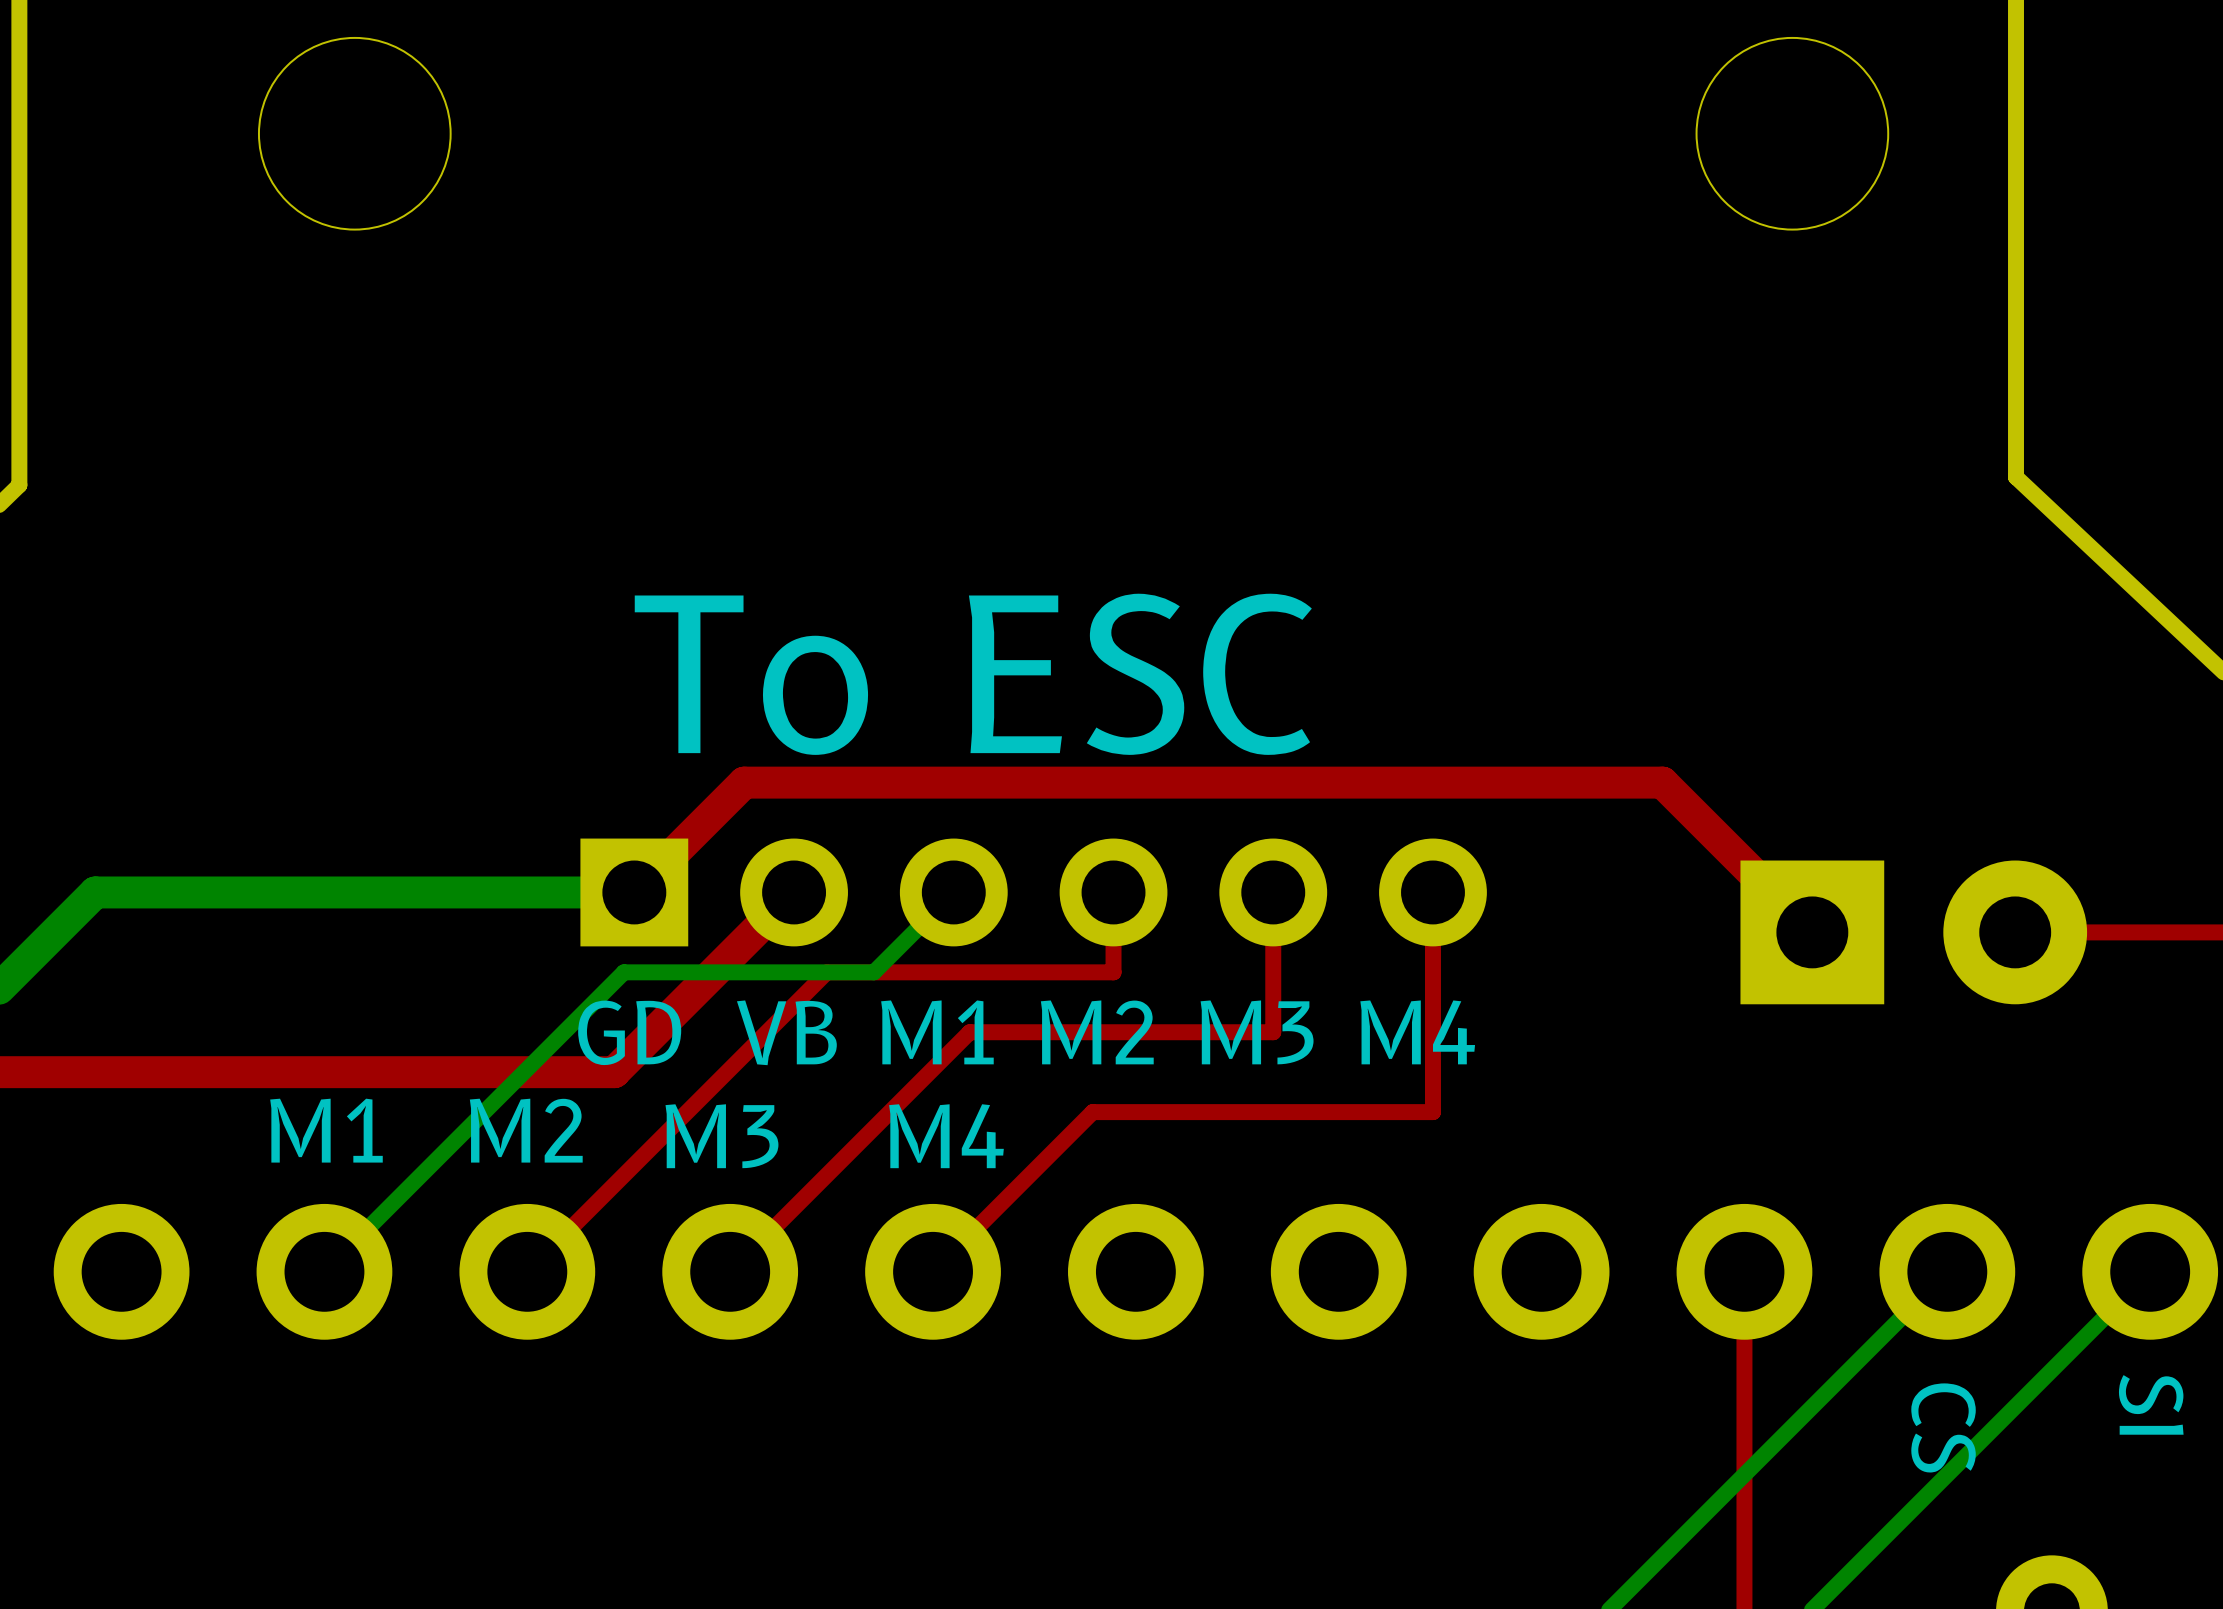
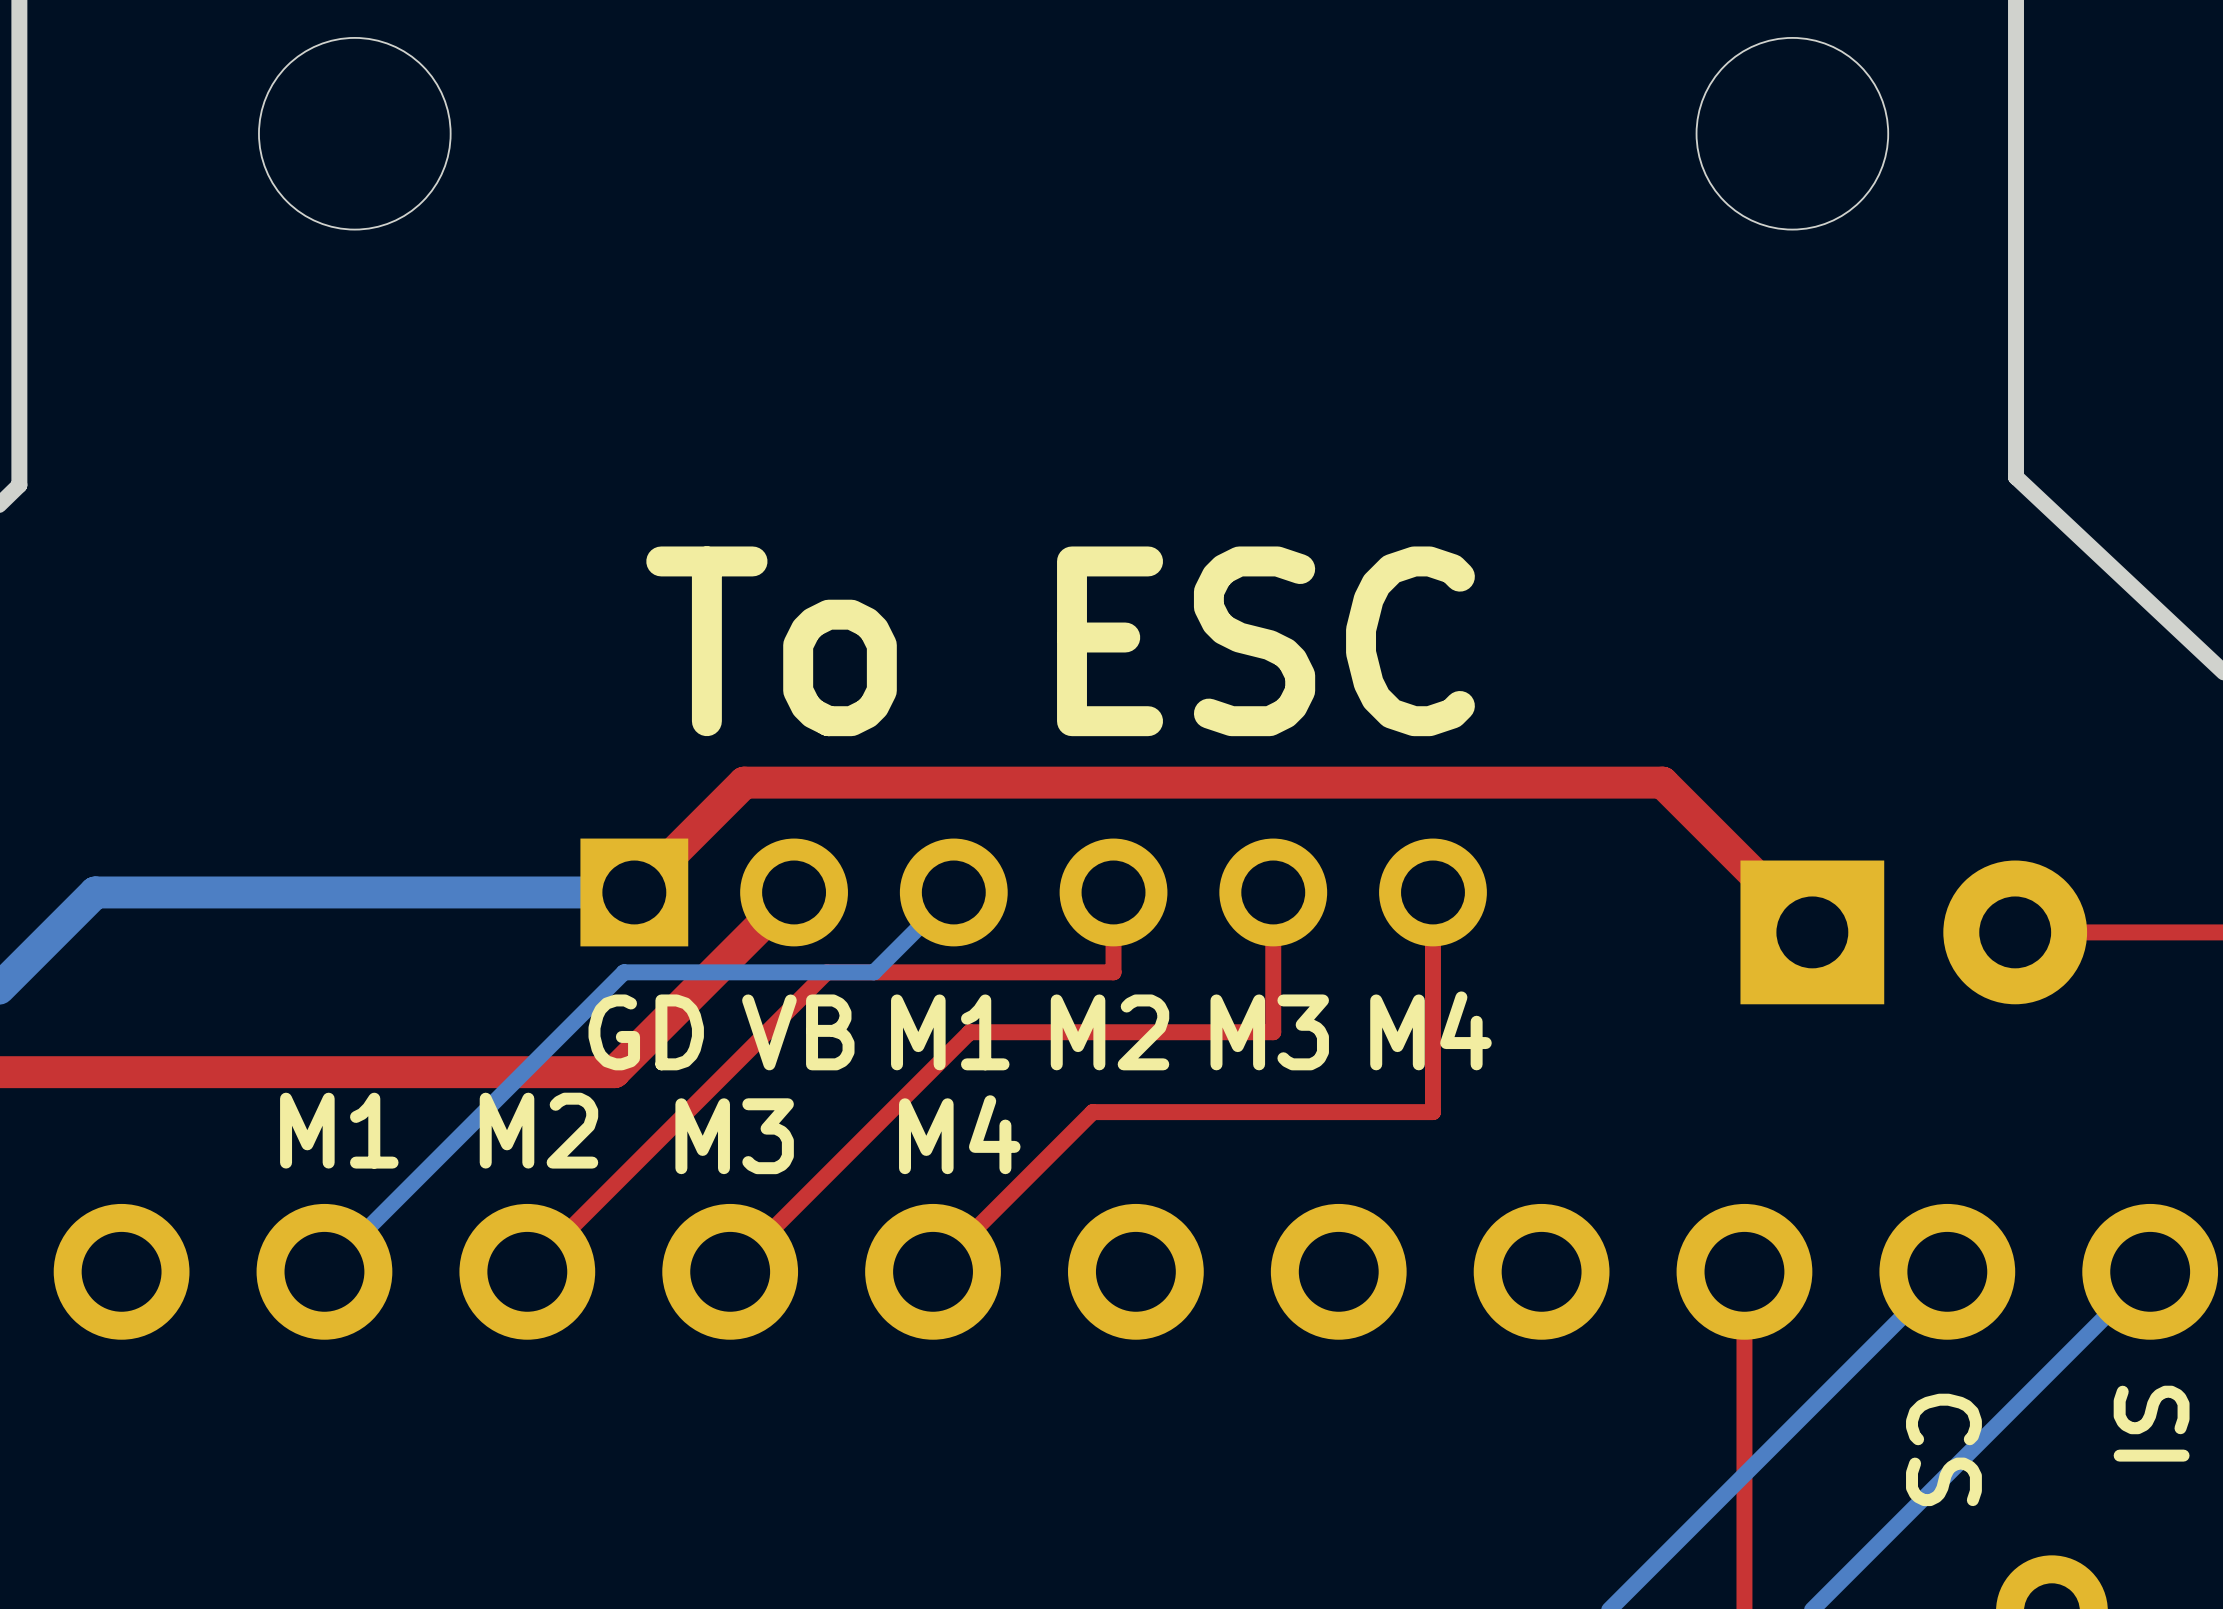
text position: To ESC (973, 674) -> To ESC (1060, 641)

